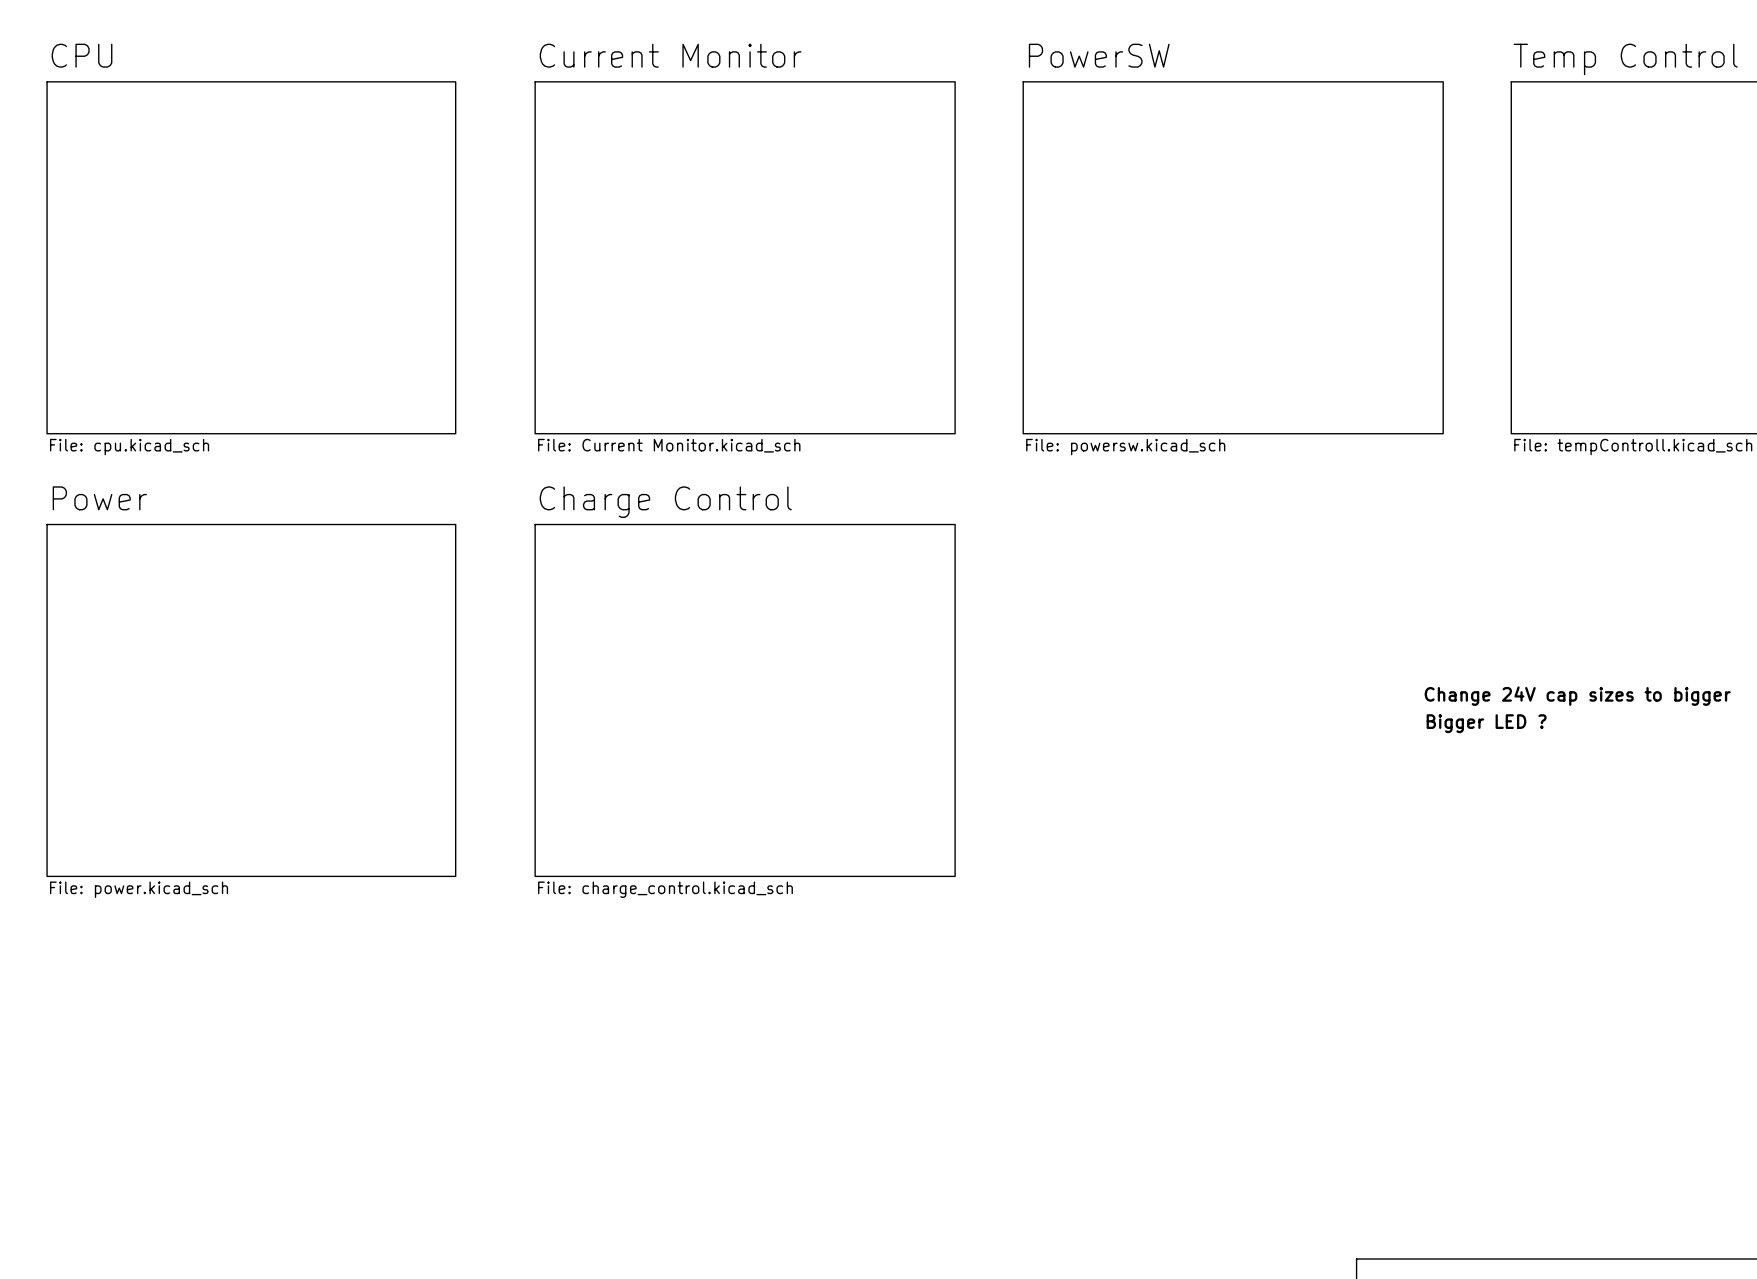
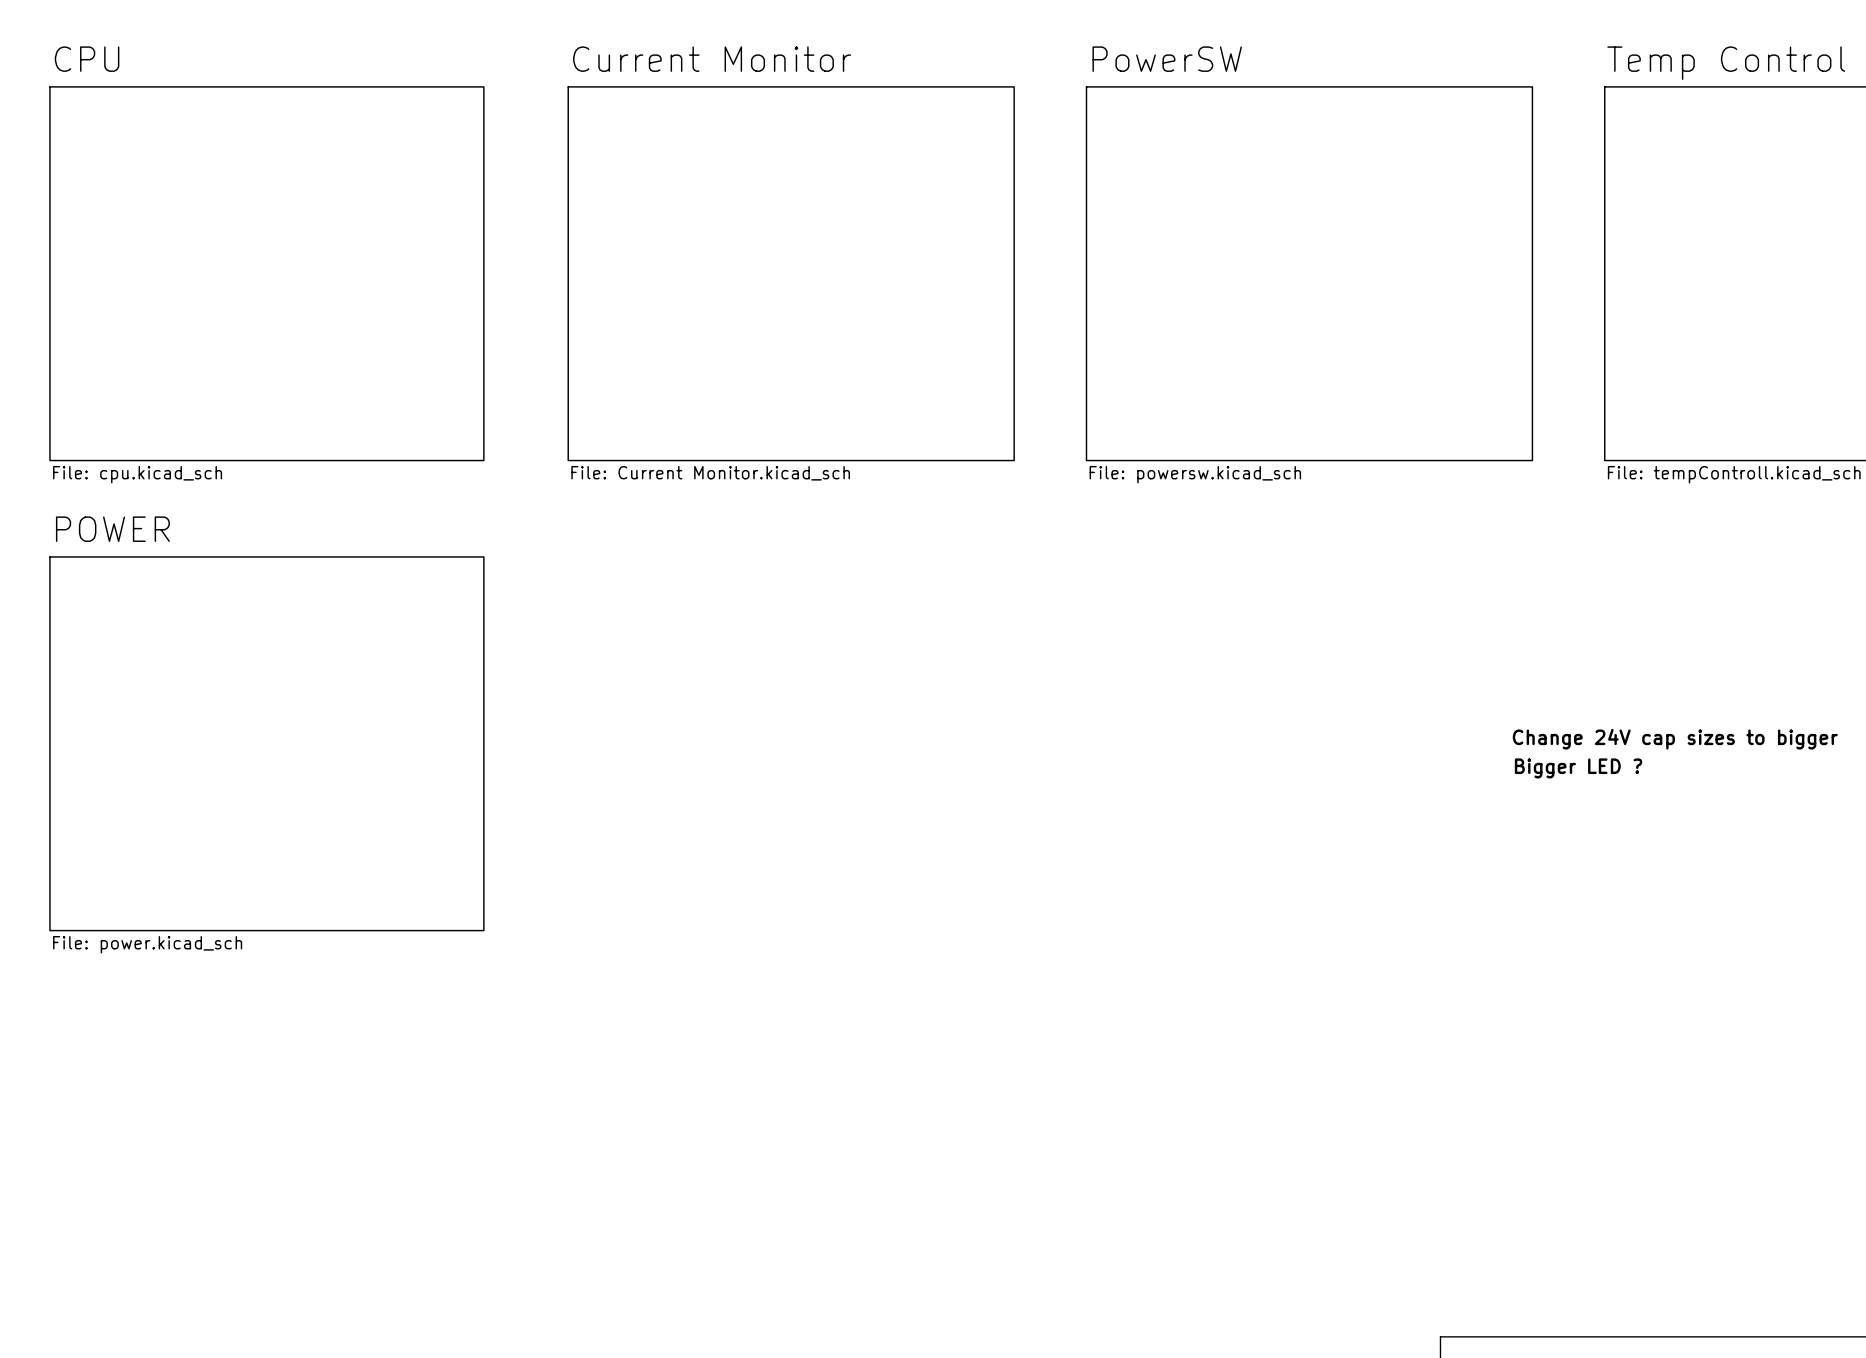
sheet Power name: Power (99, 498) -> POWER (112, 529)
sheet Charge Control: File: charge_control.kicad_sch (745, 700) -> none

